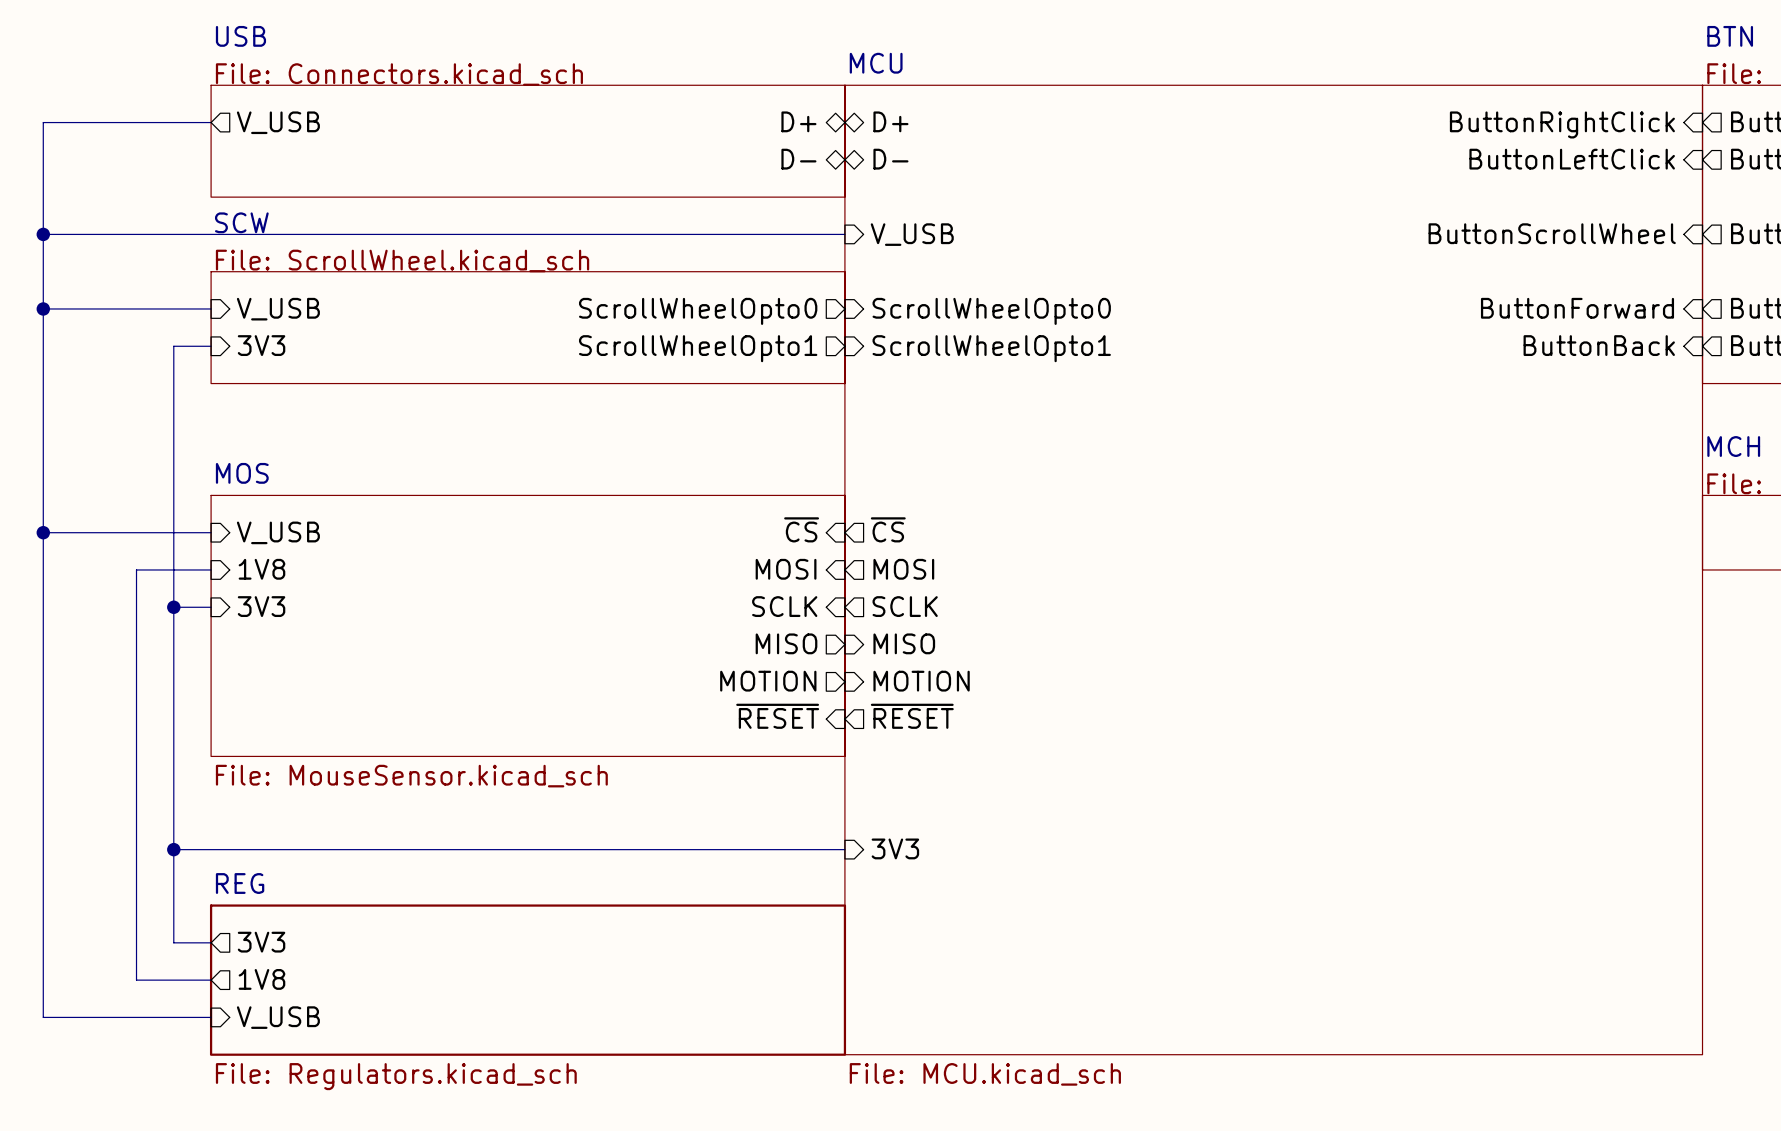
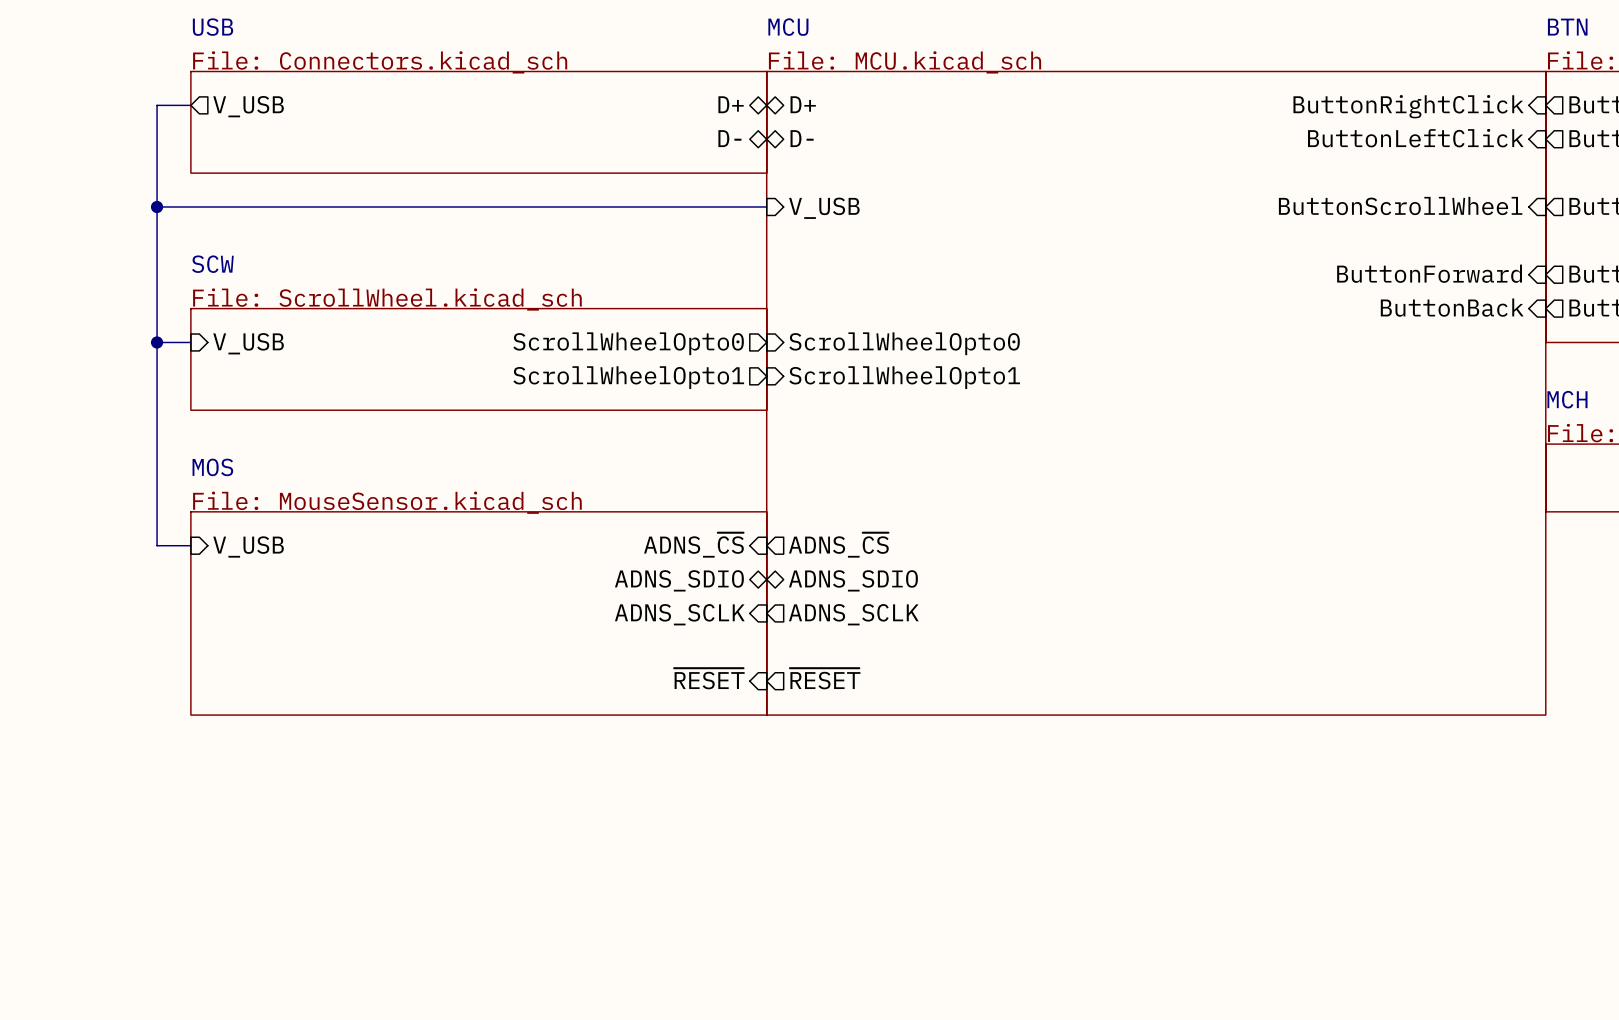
wire: (173, 122) (43, 122) (43, 1017) (211, 1017) -> none
wire: (43, 234) (173, 234) -> none
junction: (43, 234) -> none
junction: none -> (157, 206)
wire: (43, 308) (211, 308) -> none
junction: (43, 308) -> none
sheet pin: V_USB (278, 309) -> none
sheet pin: ScrollWheelOpto0 (698, 311) -> none
sheet pin: ScrollWheelOpto0 (991, 311) -> none
sheet SCW position: (528, 327) -> (478, 359)
sheet pin: 3V3 (261, 345) -> none
wire: (173, 346) (211, 346) -> (157, 308) (157, 105)
sheet pin: ScrollWheelOpto1 (698, 348) -> ScrollWheelOpto0 (628, 343)
sheet pin: ScrollWheelOpto1 (991, 348) -> ScrollWheelOpto0 (904, 343)
wire: none -> (157, 342) (190, 342)
junction: none -> (157, 342)
sheet pin: none -> V_USB (248, 343)
sheet pin: none -> ScrollWheelOpto1 (628, 377)
sheet pin: none -> ScrollWheelOpto1 (904, 377)
sheet MCU: none -> File: MCU.kicad_sch (1156, 393)
sheet pin: ~{CS} (801, 529) -> none
sheet pin: ~{CS} (888, 529) -> none
wire: (43, 532) (211, 532) -> none
junction: (43, 532) -> none
sheet pin: V_USB (278, 532) -> none
wire: (211, 569) (136, 569) (136, 980) (211, 980) -> none
sheet pin: 1V8 (261, 569) -> none
sheet pin: MOSI (786, 569) -> none
sheet pin: MOSI (903, 569) -> none
sheet MCU: File: MCU.kicad_sch (1273, 569) -> none
sheet pin: 3V3 (261, 606) -> V_USB (248, 546)
sheet pin: SCLK (784, 606) -> ADNS_~{CS} (693, 545)
sheet pin: SCLK (905, 606) -> ADNS_~{CS} (838, 545)
wire: (173, 607) (173, 942) (211, 942) -> none
junction: (173, 607) -> none
sheet MOS: File: MouseSensor.kicad_sch (528, 625) -> none
sheet pin shape: output (786, 643) -> bidirectional (679, 580)
sheet pin: MISO (786, 643) -> ADNS_SDIO (679, 580)
sheet pin shape: input (904, 643) -> bidirectional (853, 580)
sheet pin: MISO (904, 643) -> ADNS_SDIO (853, 580)
sheet MOS: none -> File: MouseSensor.kicad_sch (478, 613)
sheet pin shape: output (768, 681) -> input (679, 614)
sheet pin: MOTION (768, 681) -> ADNS_SCLK (679, 614)
sheet pin shape: input (921, 681) -> output (853, 614)
sheet pin: MOTION (921, 681) -> ADNS_SCLK (853, 614)
sheet pin position: ~{RESET} (777, 716) -> ~{RESET} (709, 678)
sheet pin position: ~{RESET} (912, 716) -> ~{RESET} (825, 678)
sheet pin: 3V3 (895, 848) -> none
wire: (173, 849) (844, 849) -> none
junction: (173, 849) -> none
sheet pin: 3V3 (261, 942) -> none
sheet pin: 1V8 (261, 979) -> none
sheet REG: File: Regulators.kicad_sch (528, 980) -> none
sheet pin: V_USB (278, 1017) -> none

